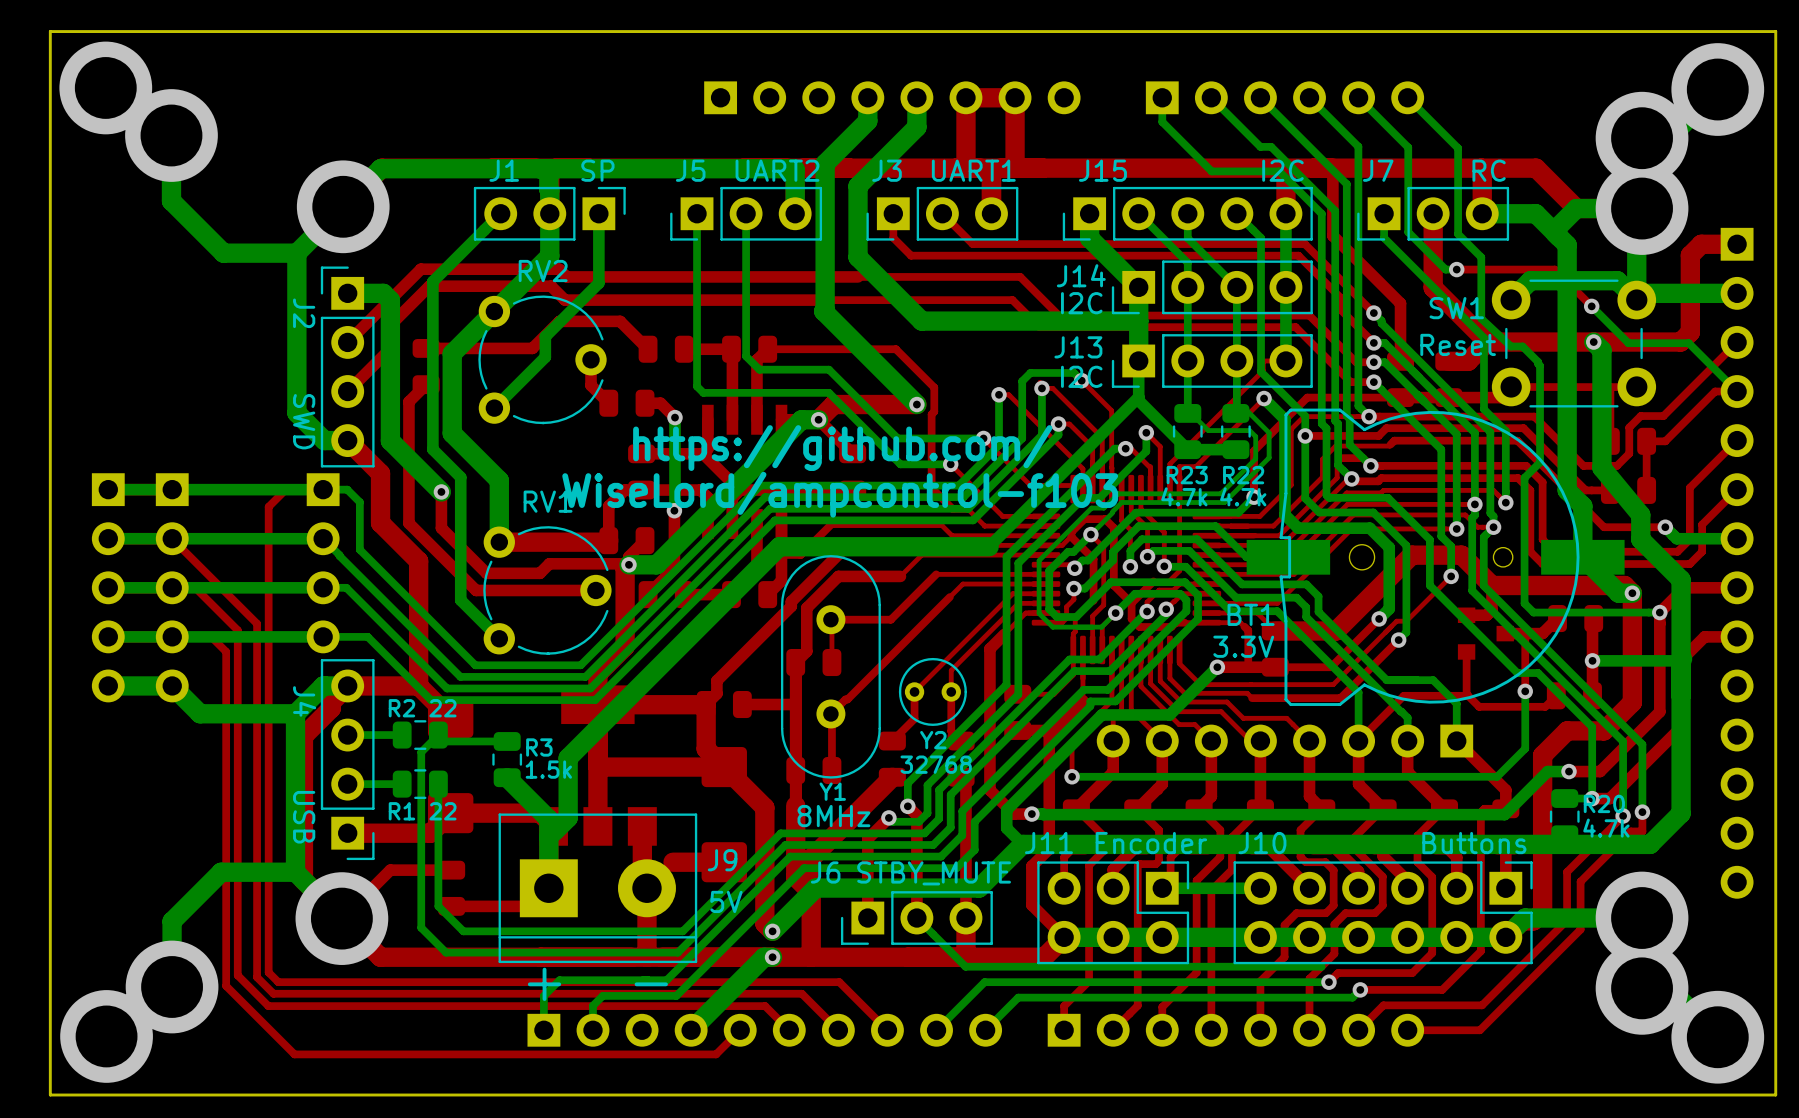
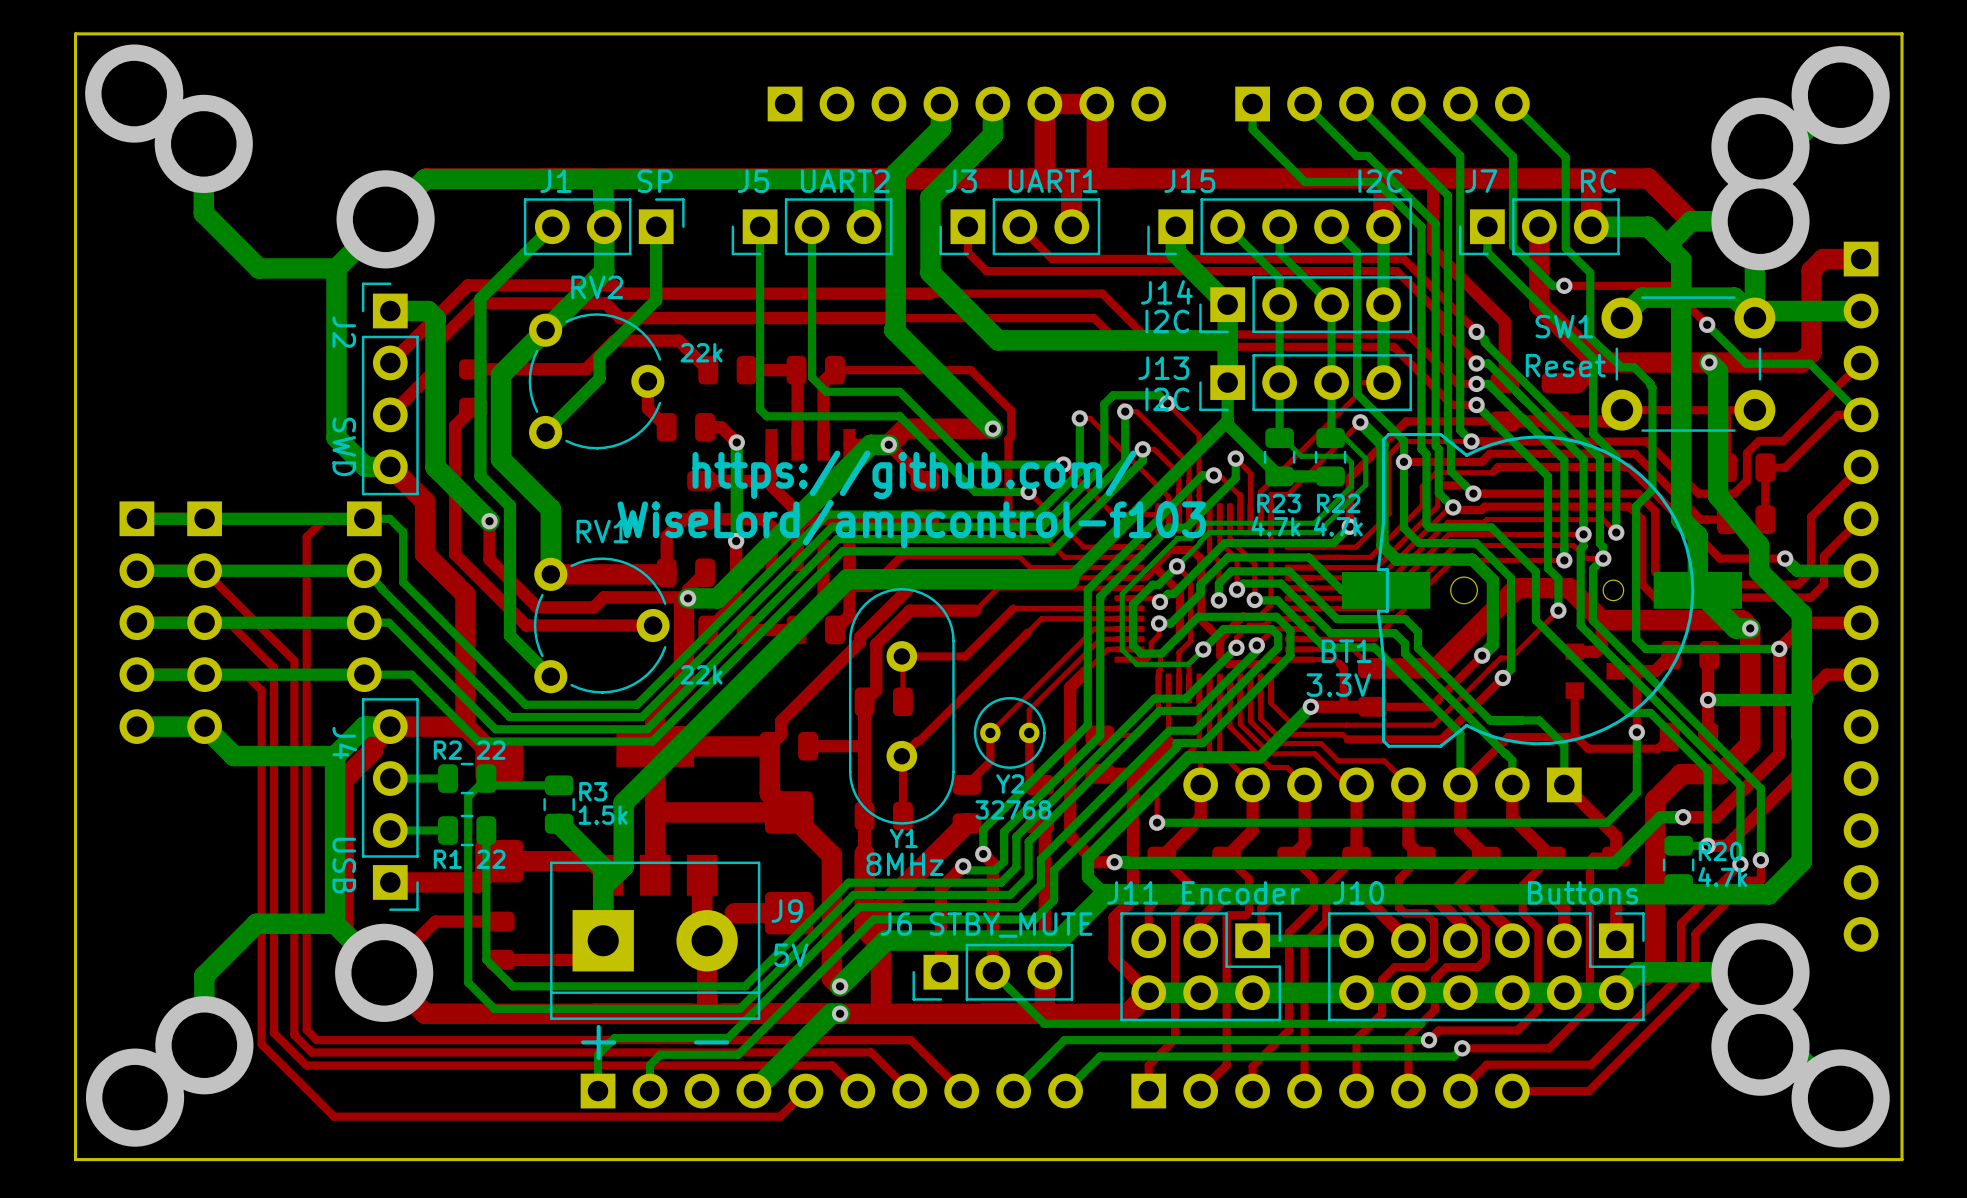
RV2 value: none -> 22k (701, 352)
RV1 value: none -> 22k (701, 674)

